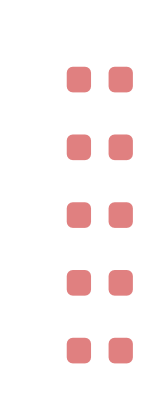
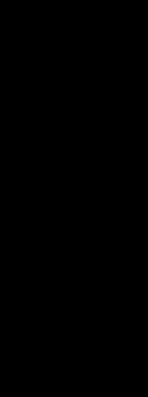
part: (99, 79) -> none
part: (99, 147) -> none
part: (99, 215) -> none
part: (99, 282) -> none
part: (99, 350) -> none

